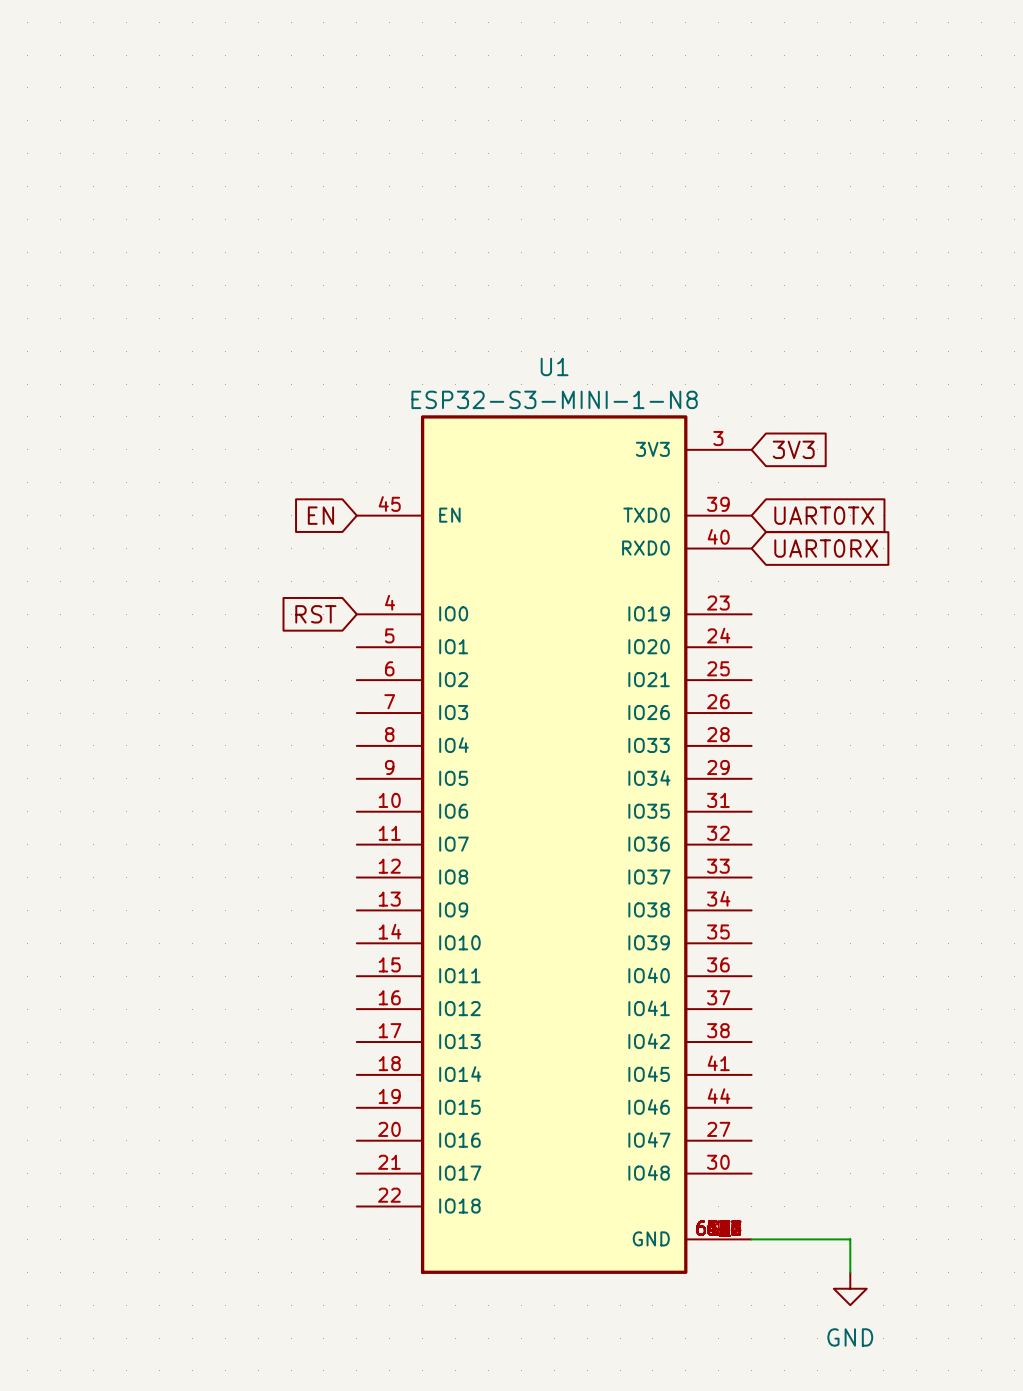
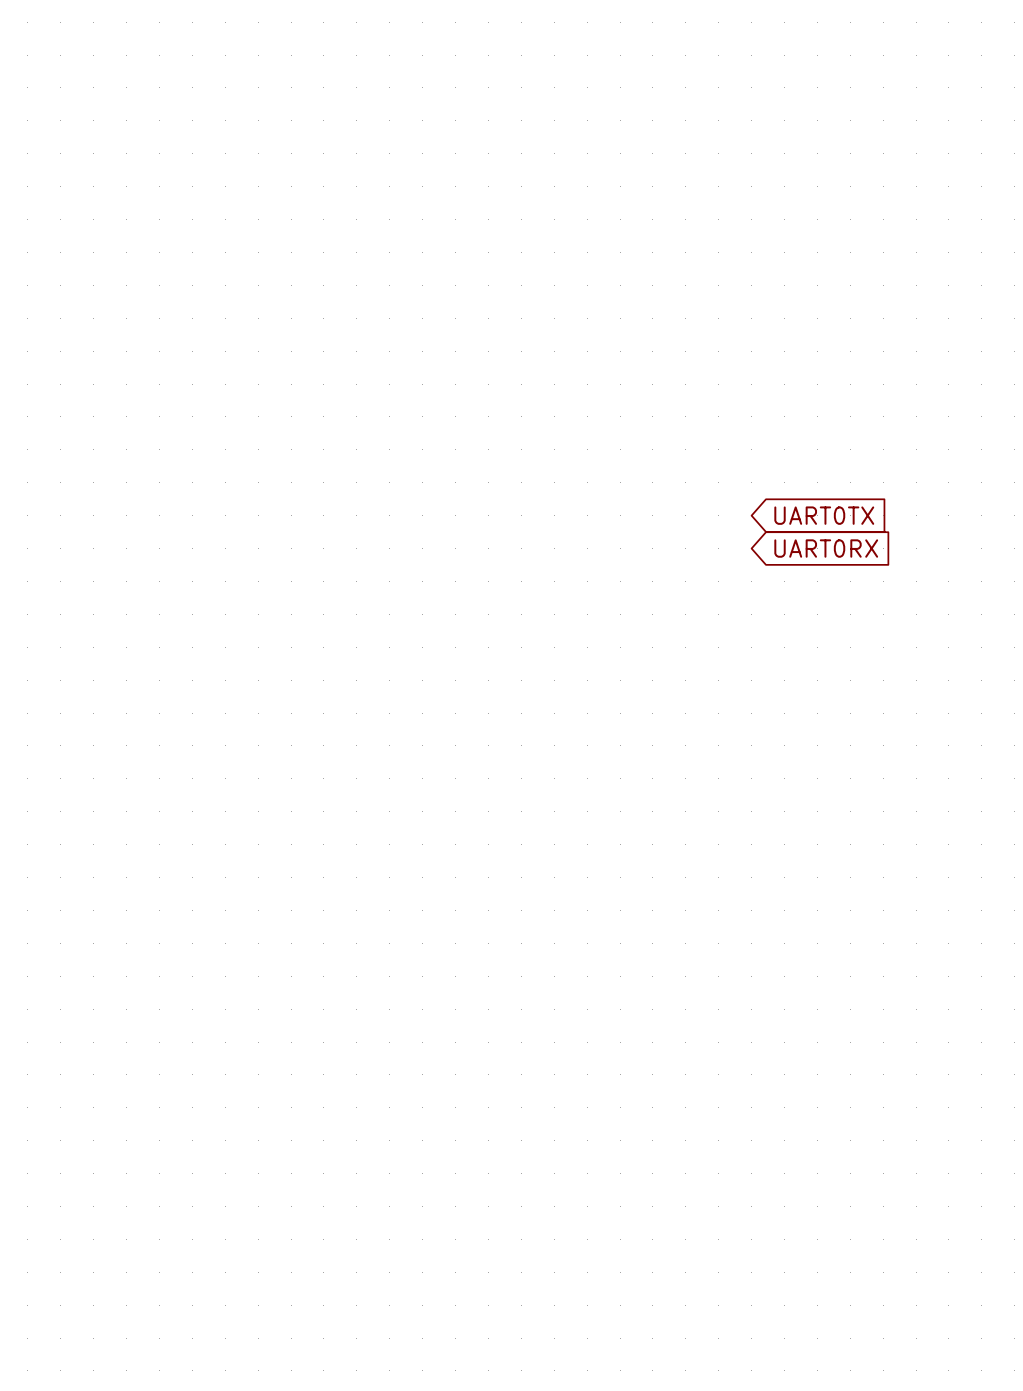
global label: 3V3 (793, 449) -> none
global label: EN (320, 515) -> none
global label: RST (315, 614) -> none
U1: ESP32-S3-MINI-1-N8 (554, 844) -> none
wire: (751, 1239) (850, 1239) (850, 1272) -> none
power symbol: GND (850, 1288) -> none

